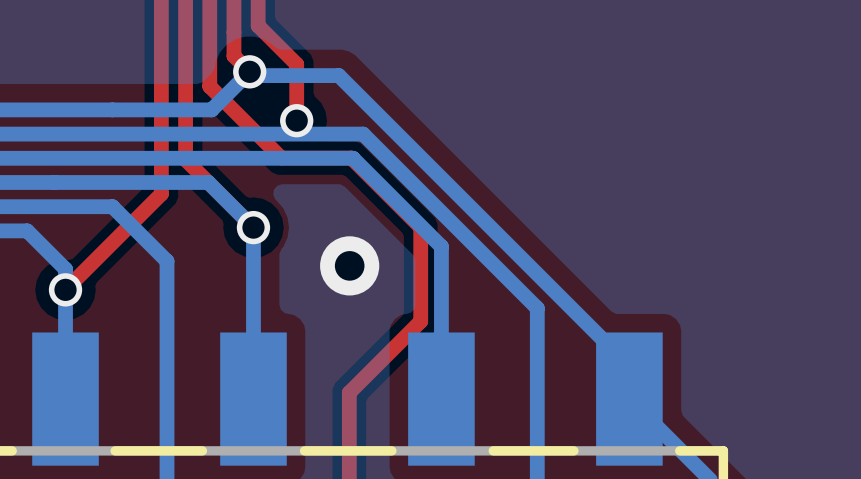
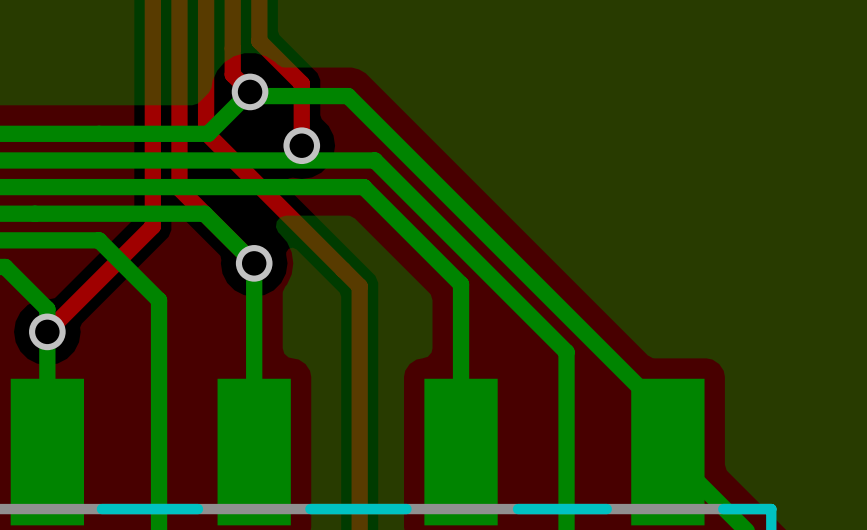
top track: (209, 86) (281, 158) (351, 158) (420, 227) (420, 321) (349, 392) -> (206, 108) (206, 132) (359, 286) (359, 445)
via: (349, 265) -> none

